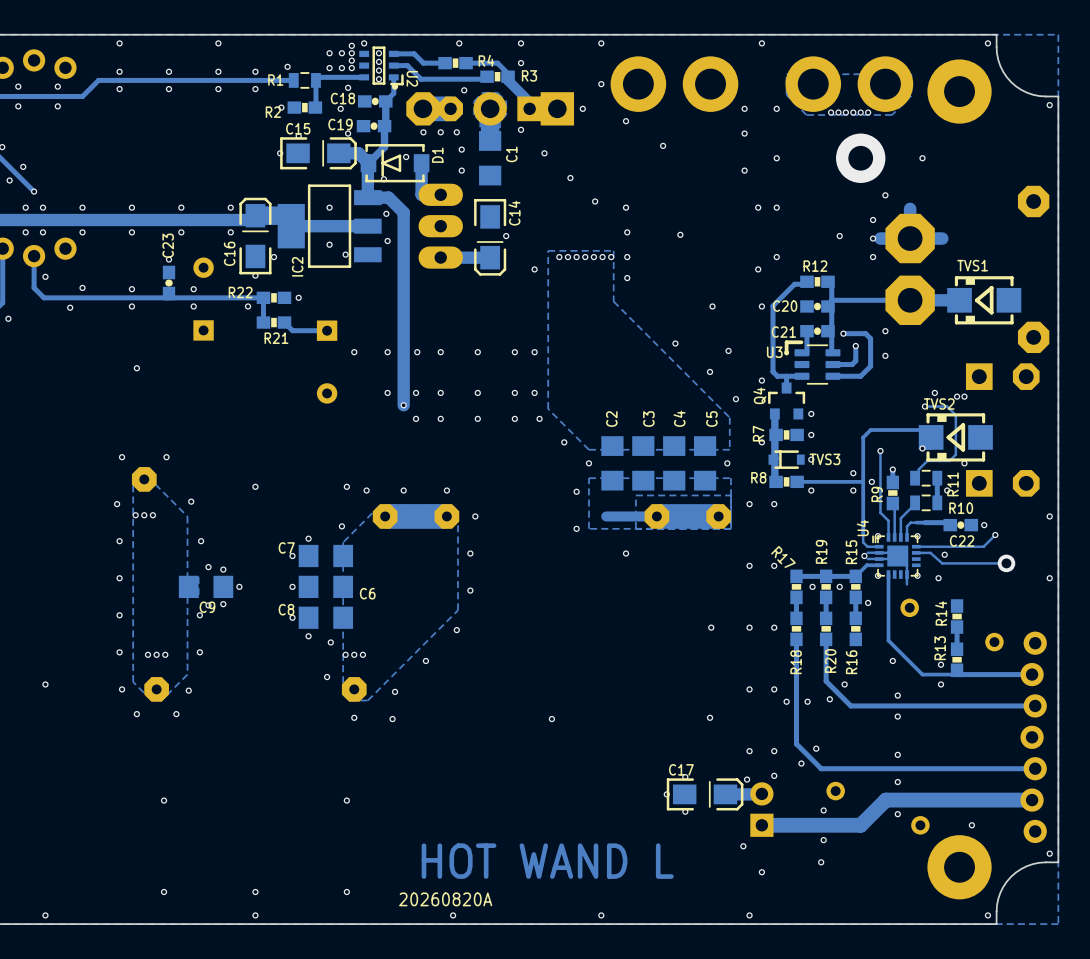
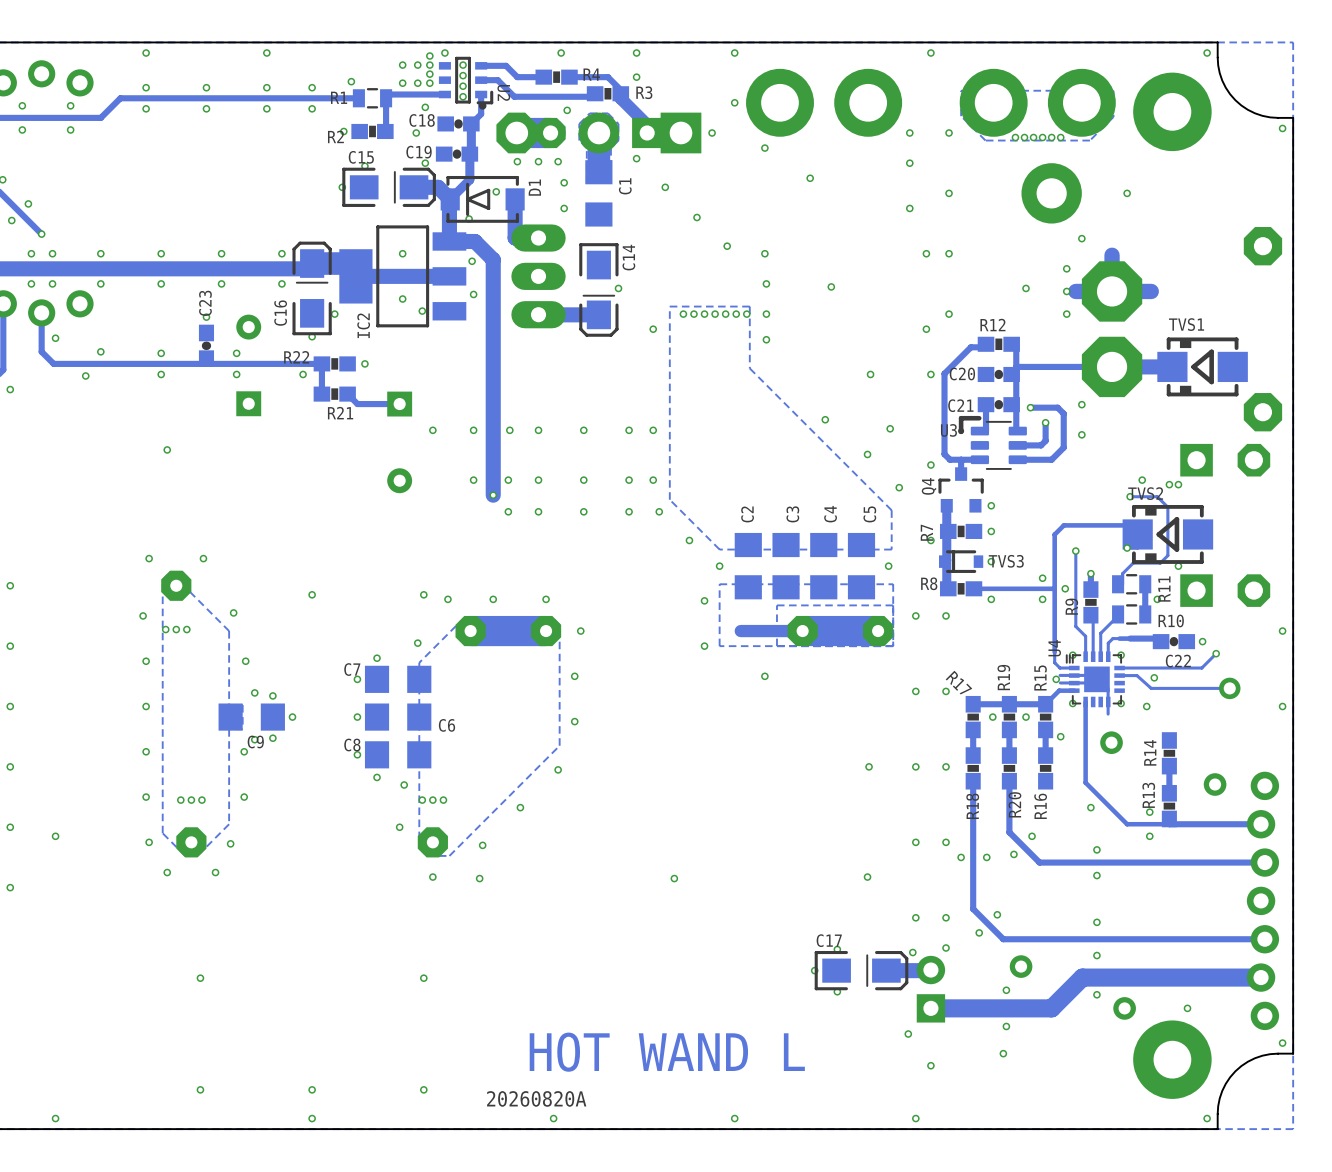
via: none -> (10, 585)
via: none -> (10, 646)
via: none -> (10, 706)
via: none -> (10, 766)
via: none -> (10, 827)
via: none -> (10, 887)

